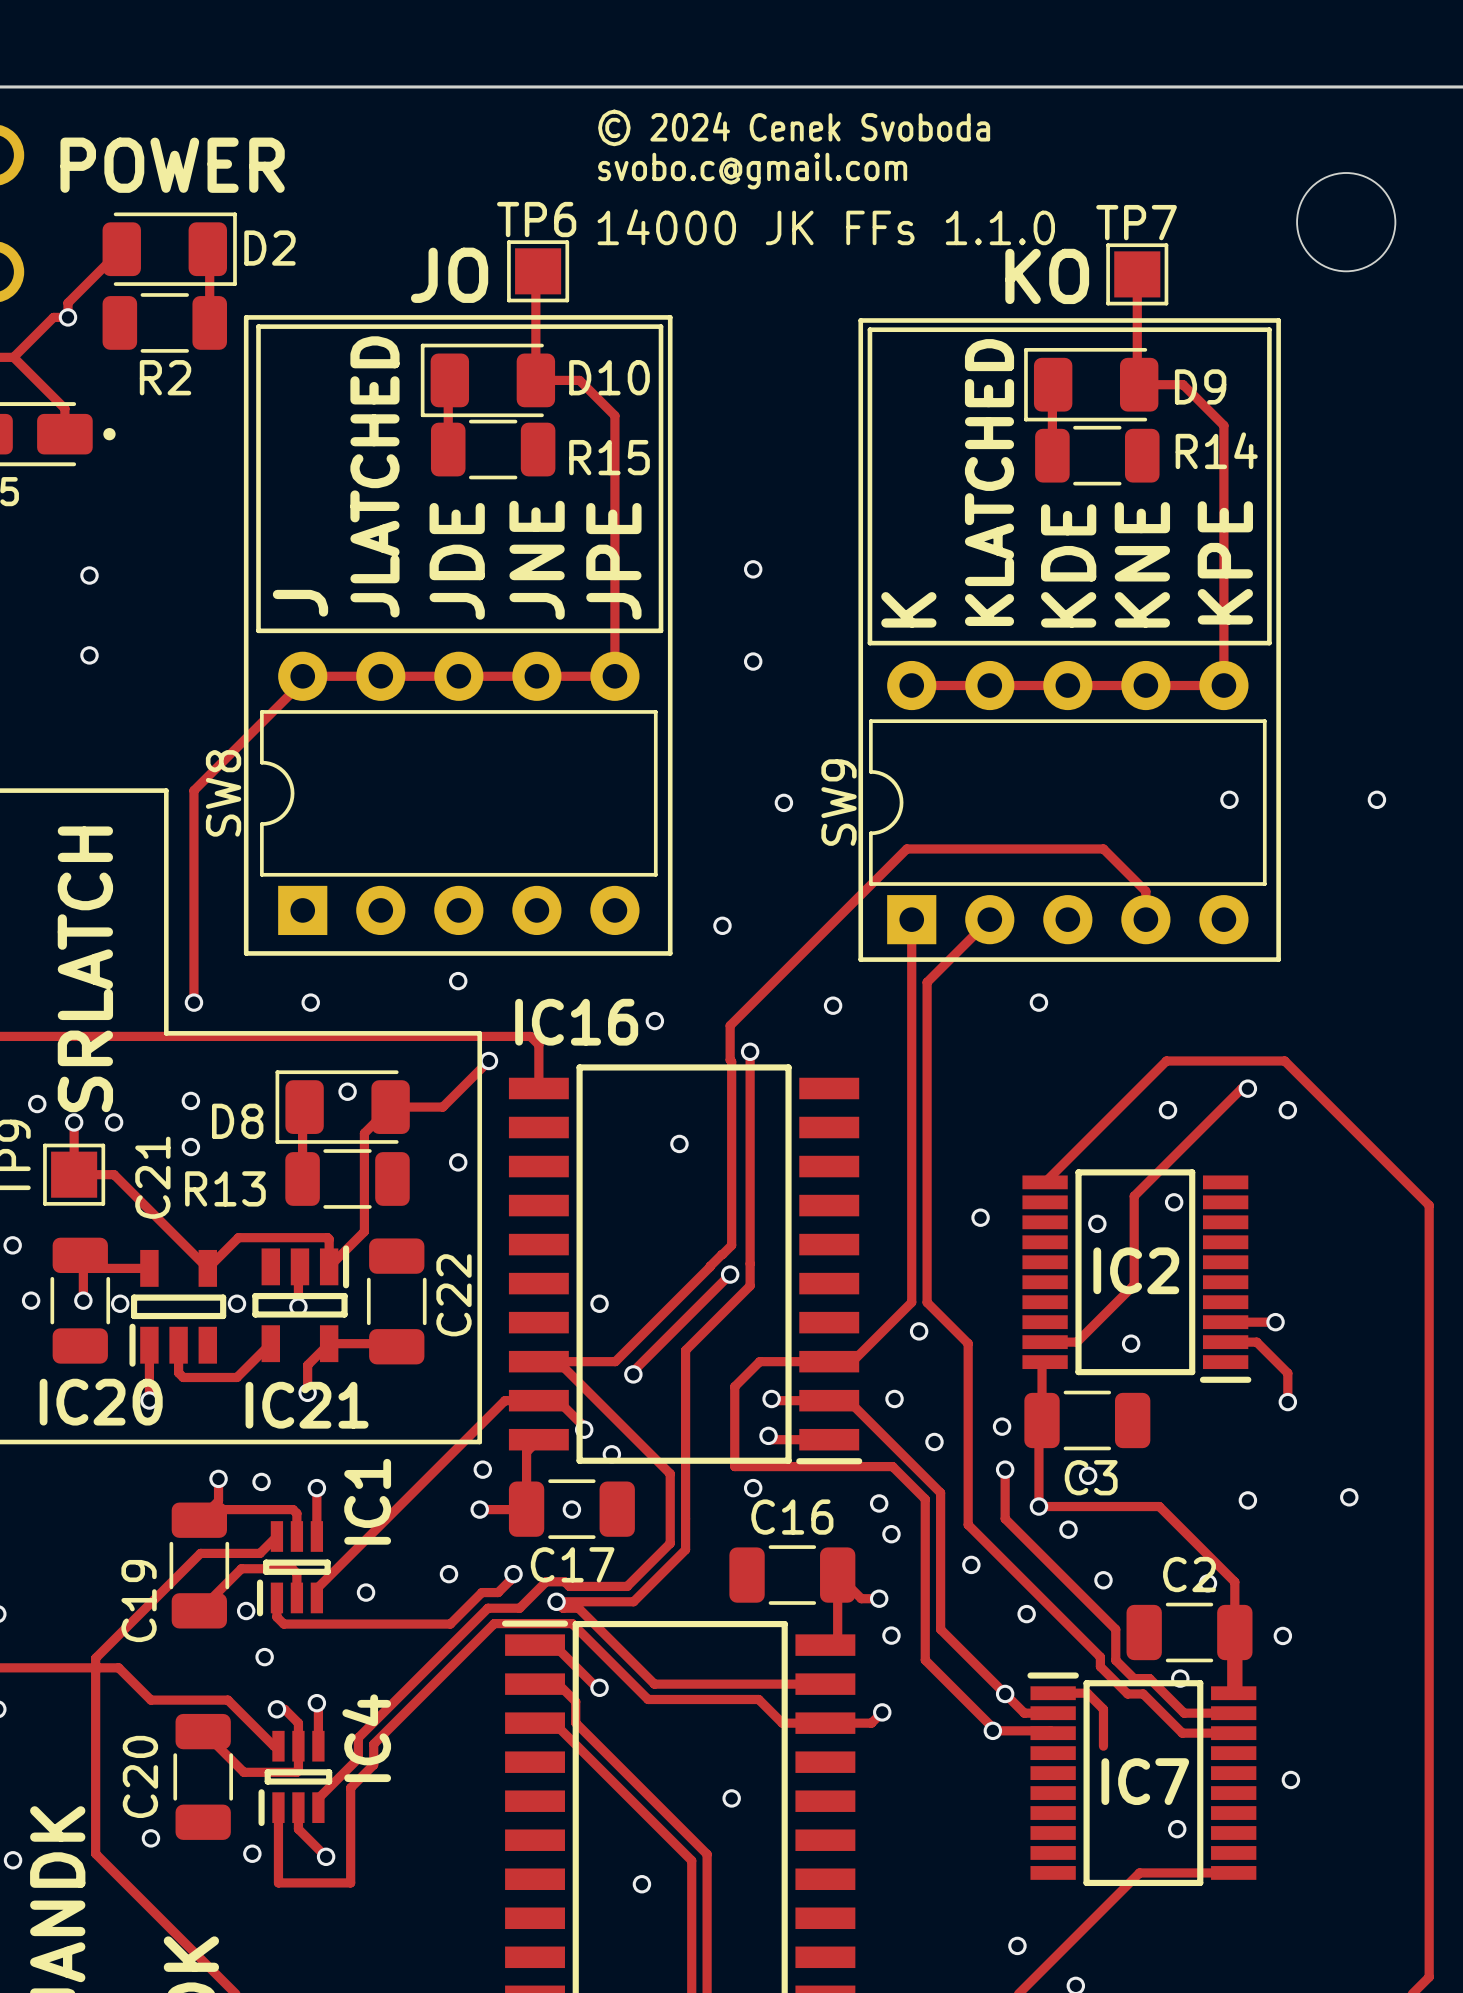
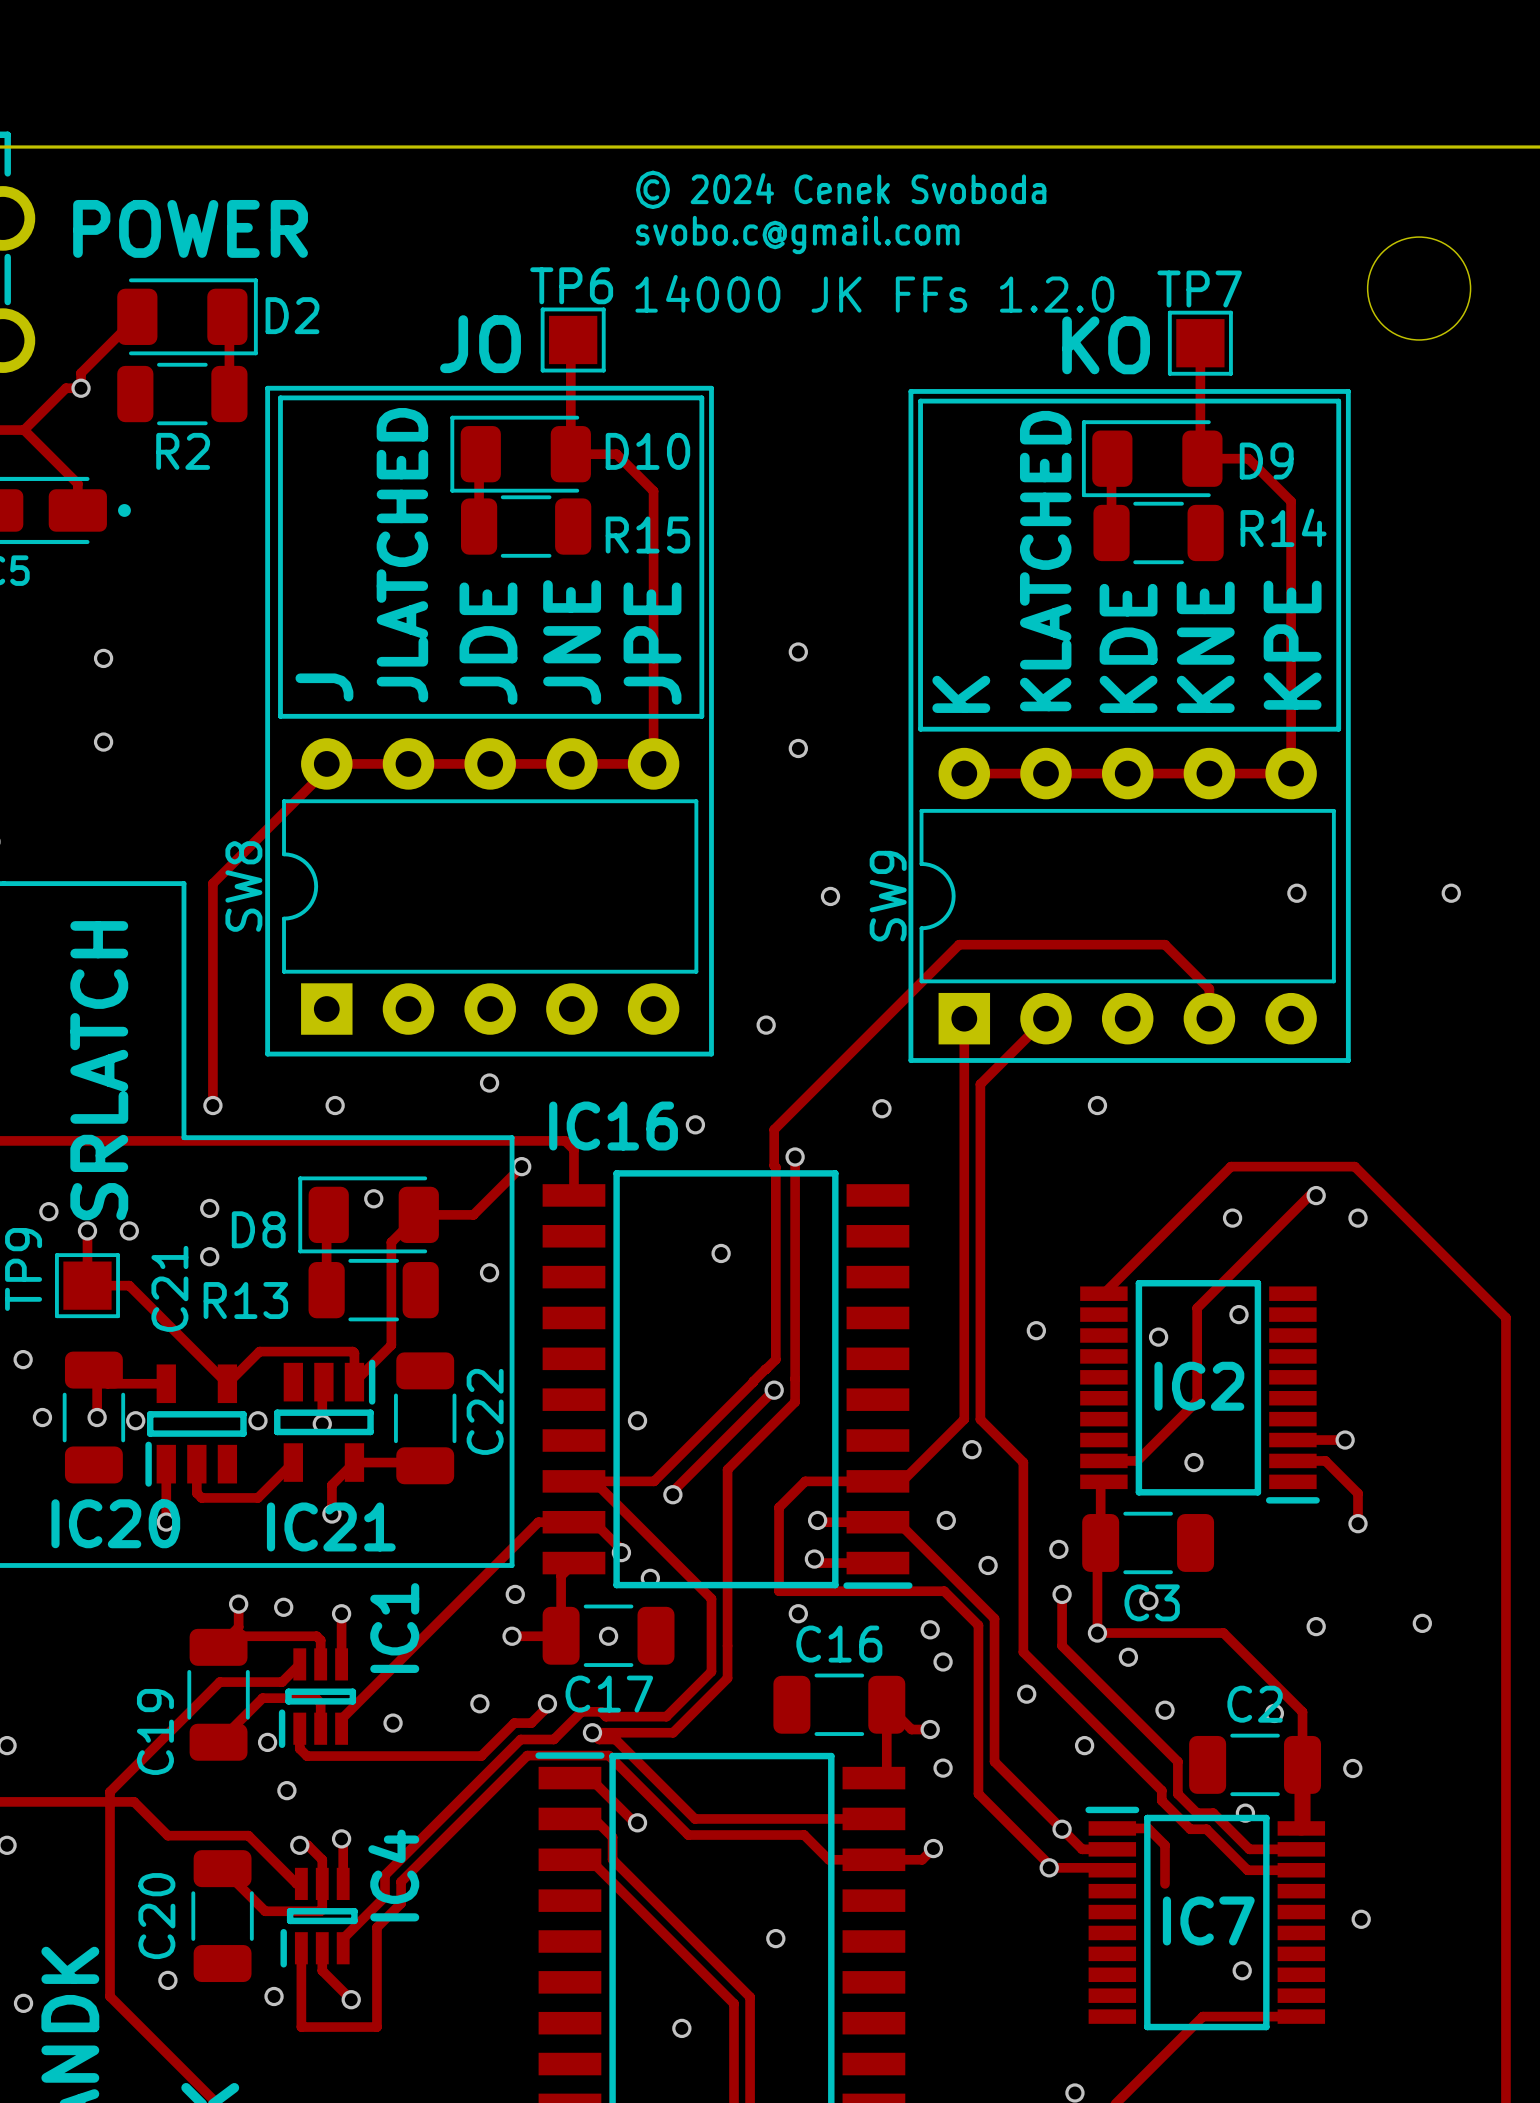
text: 14000 JK FFs 1.1.0 (826, 227) -> 14000 JK FFs 1.2.0 (874, 293)

